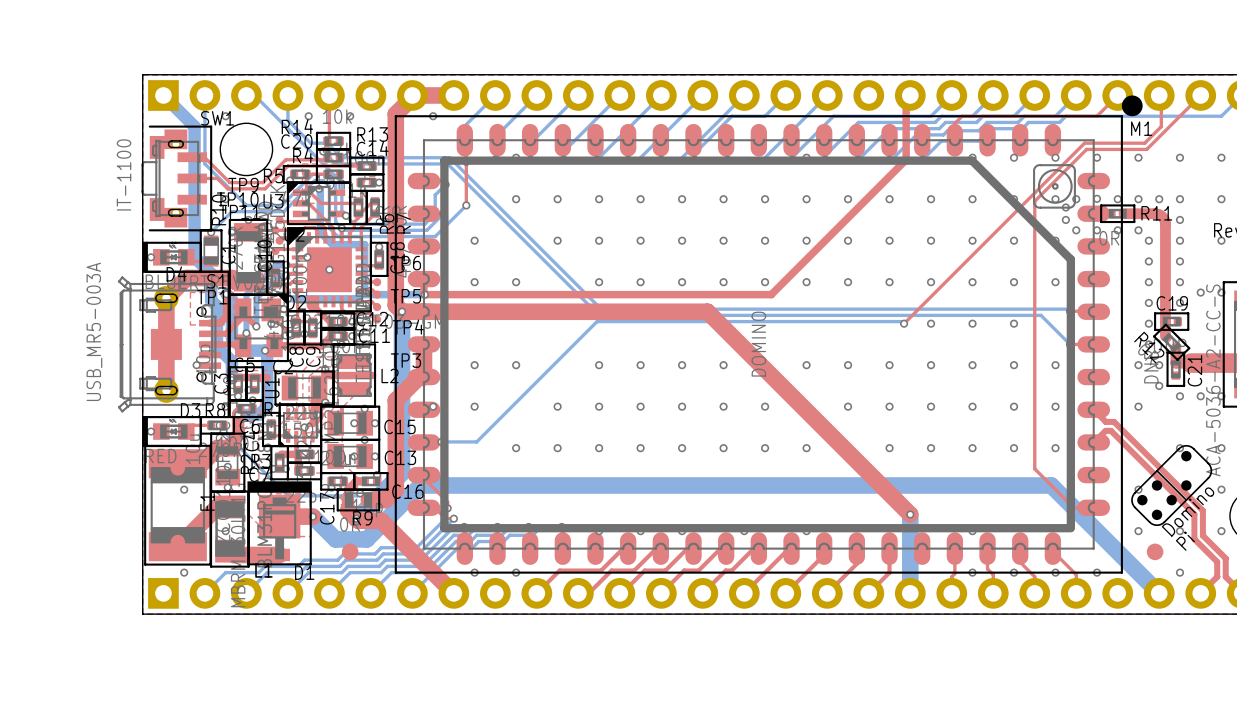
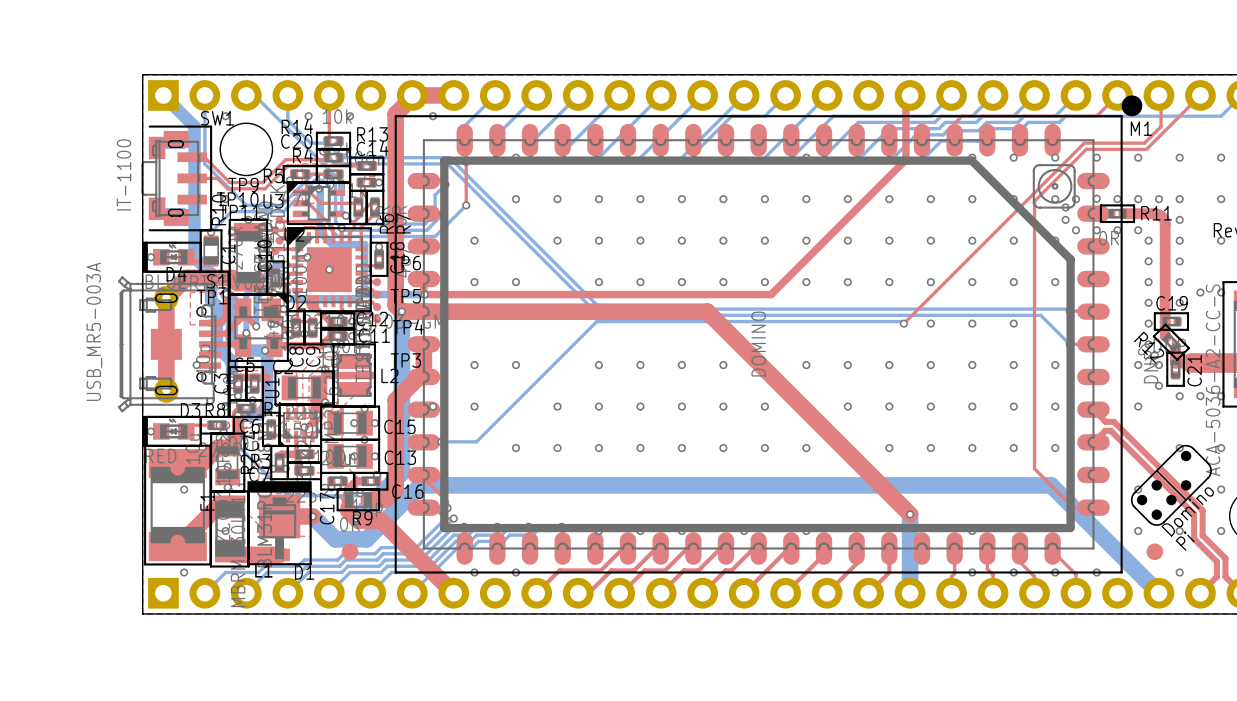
SW1 footprint: [141, 125, 213, 232] -> [141, 125, 213, 232]

